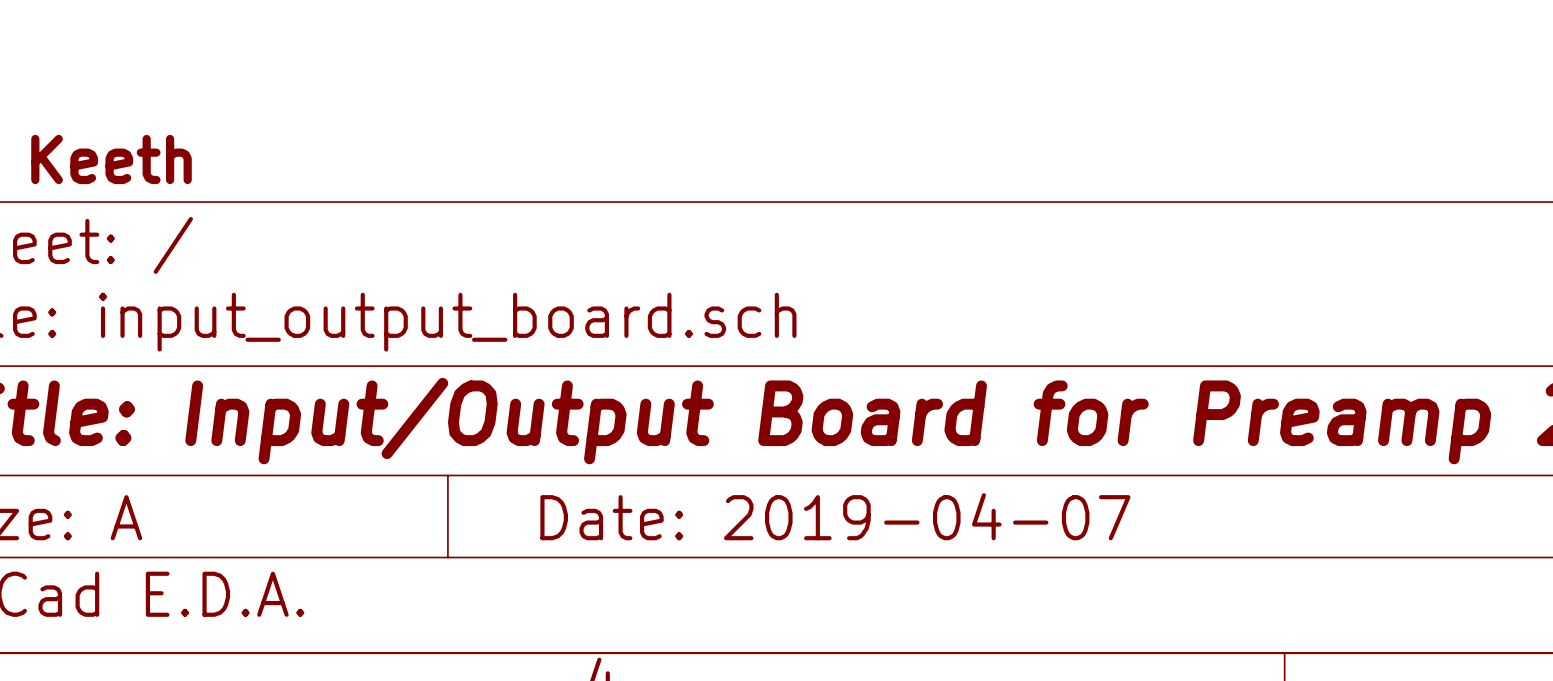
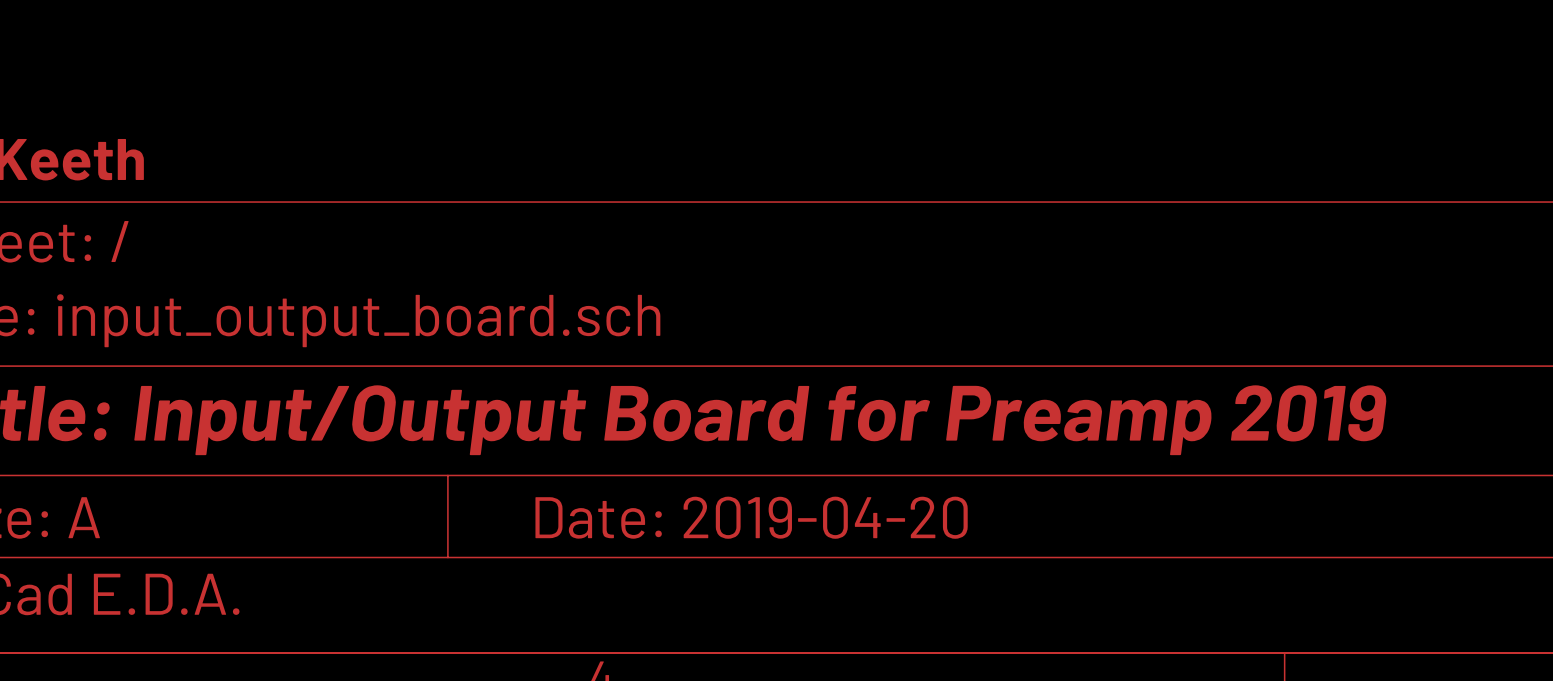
title block: Date: 2019-04-07 (835, 516) -> Date: 2019-04-20 (751, 517)

